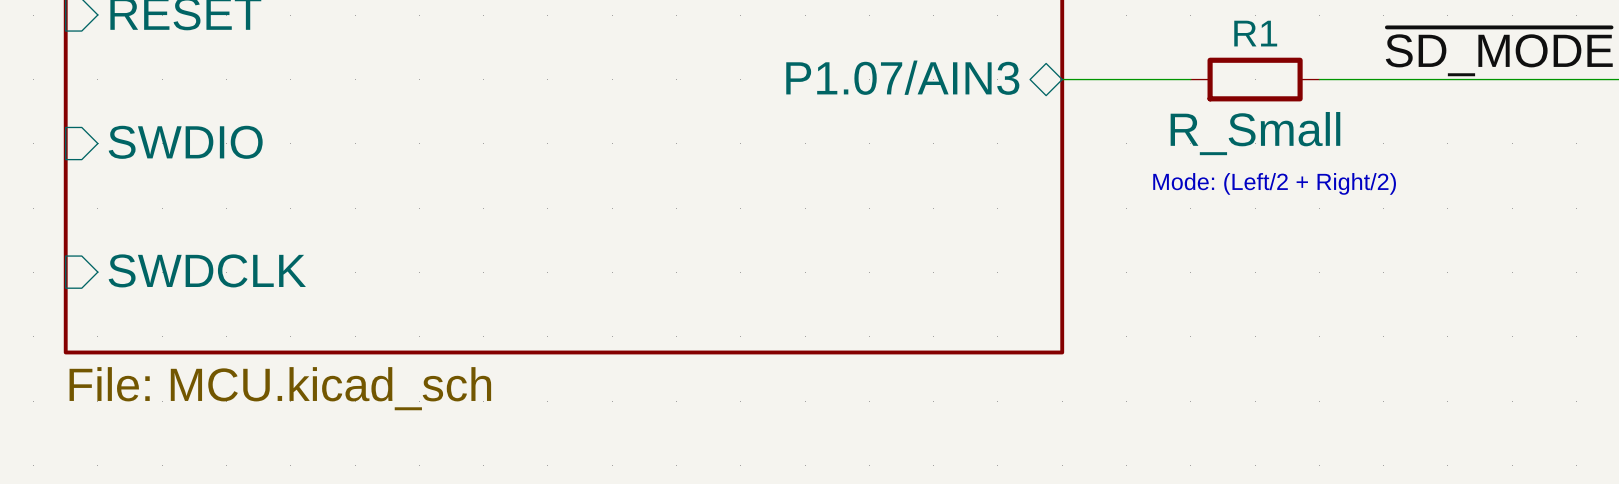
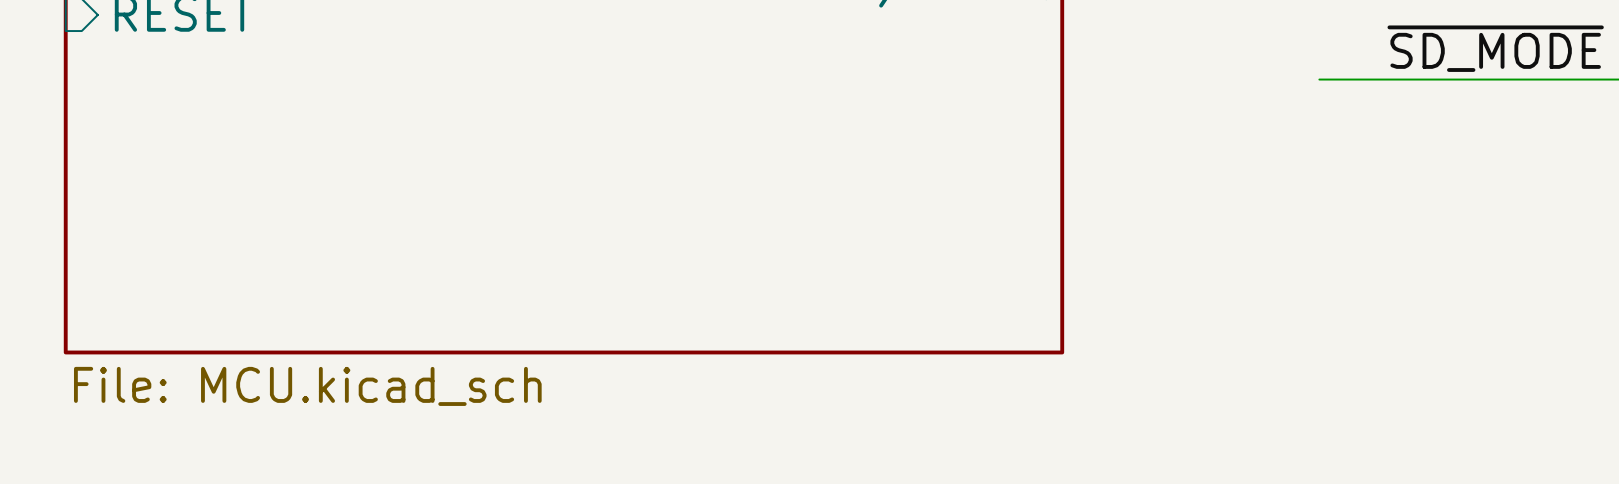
sheet pin: P1.07/AIN3 (902, 77) -> none
wire: (1062, 79) (1190, 79) -> none
R1: R_Small (1255, 79) -> none
sheet pin: SWDIO (185, 142) -> none
text: Mode: (Left/2 + Right/2) (1274, 183) -> none
sheet pin: SWDCLK (207, 270) -> none

